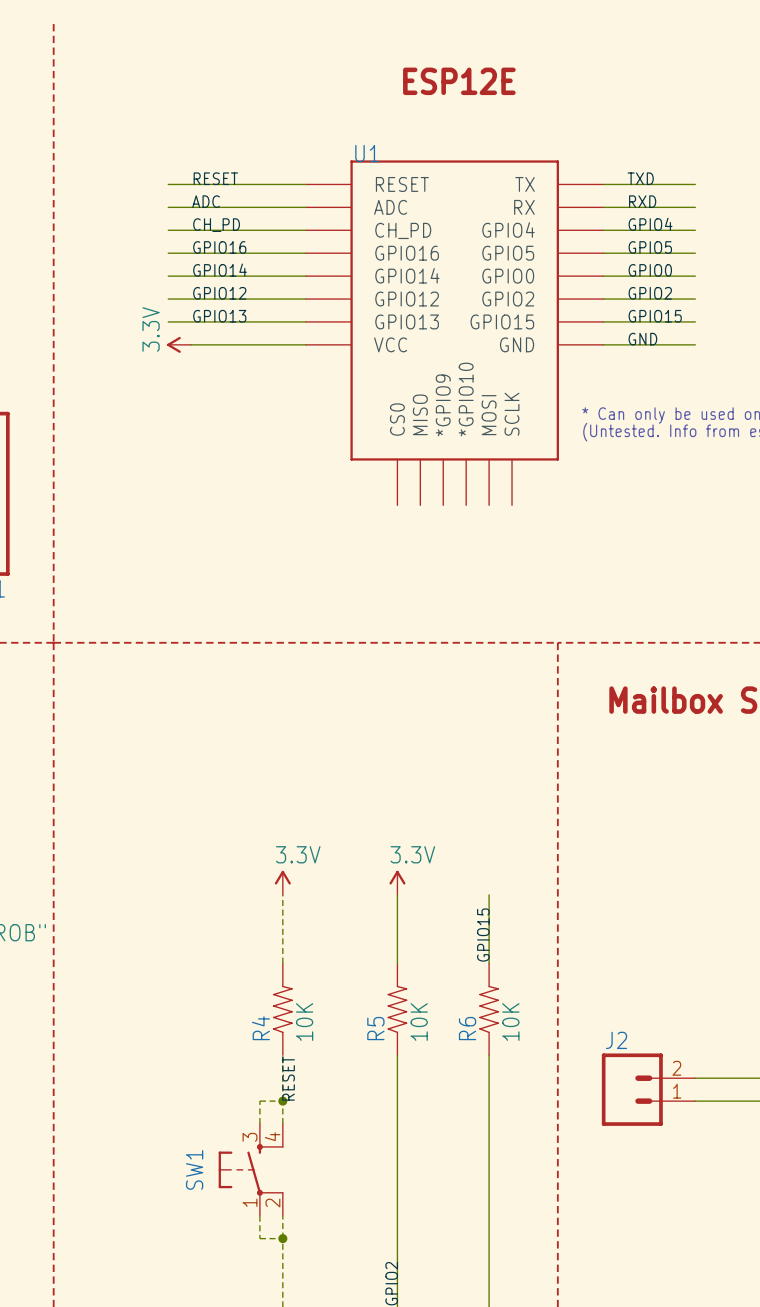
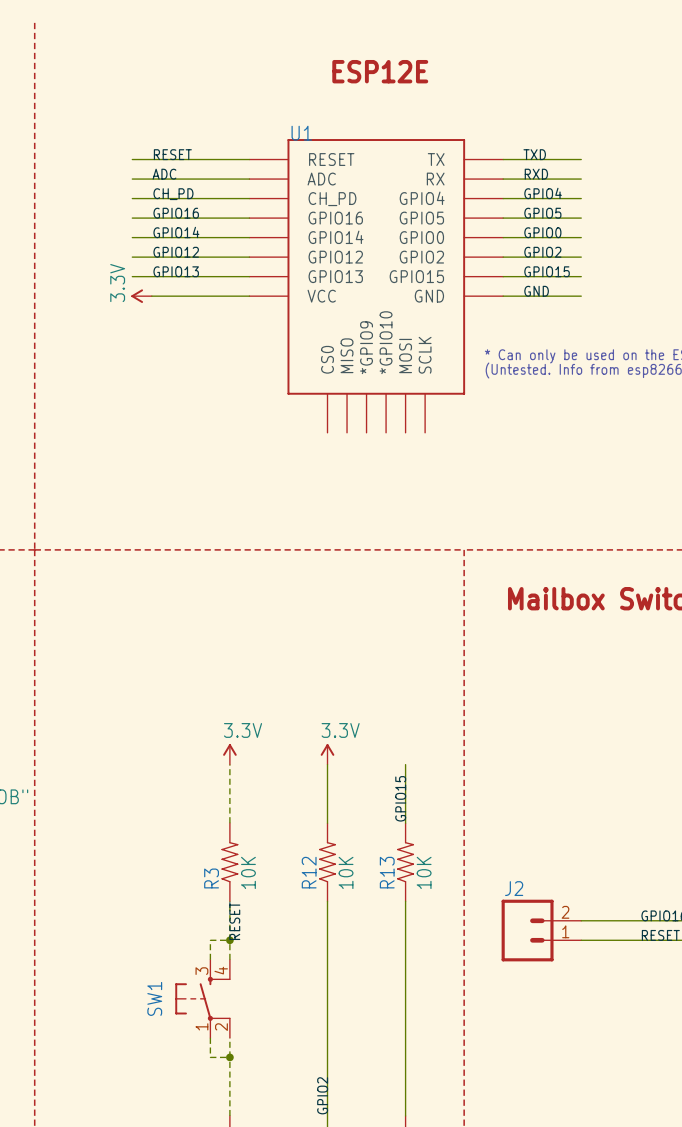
R4 name: R4 (260, 1028) -> R3 (211, 878)
R5 name: R5 (375, 1028) -> R12 (309, 872)
R6 name: R6 (467, 1028) -> R13 (387, 872)

